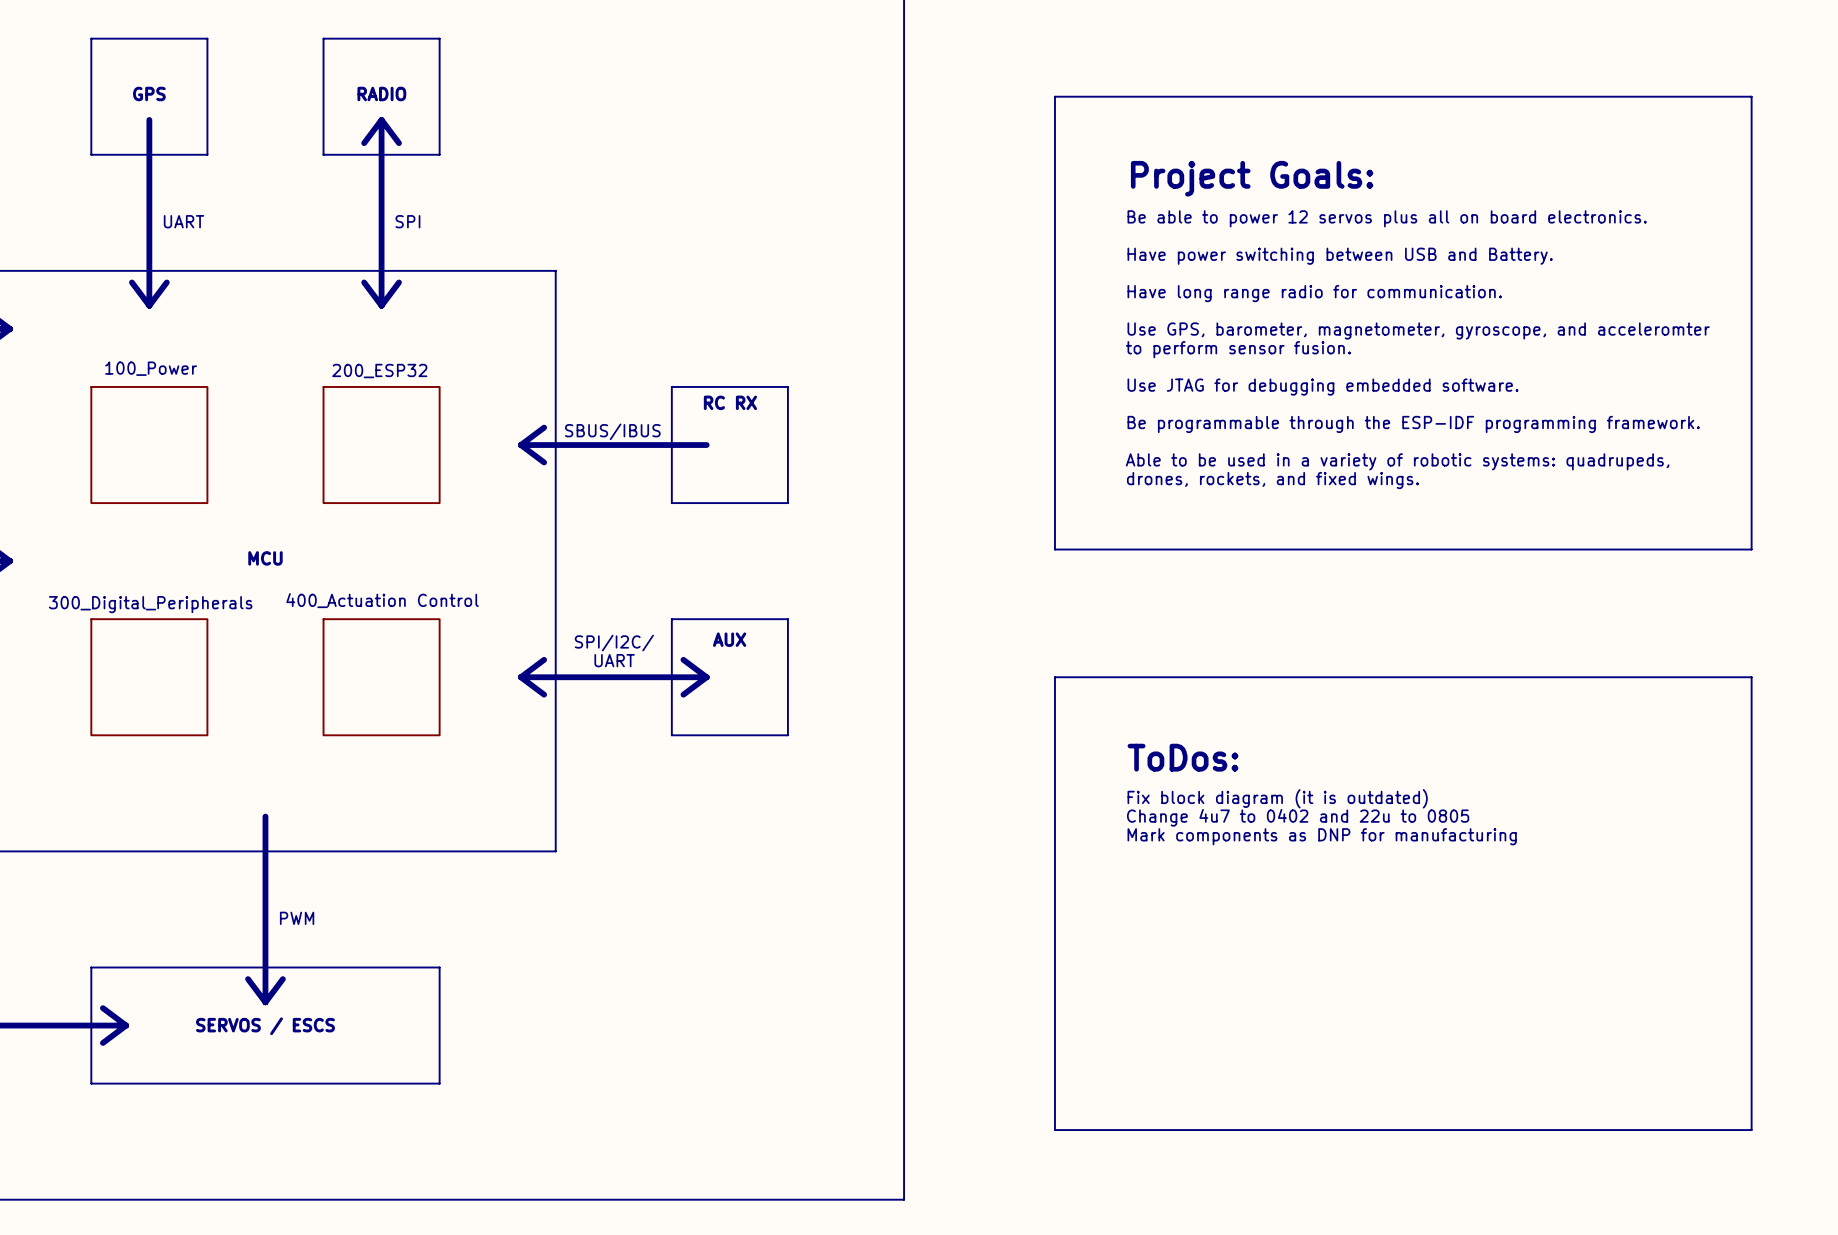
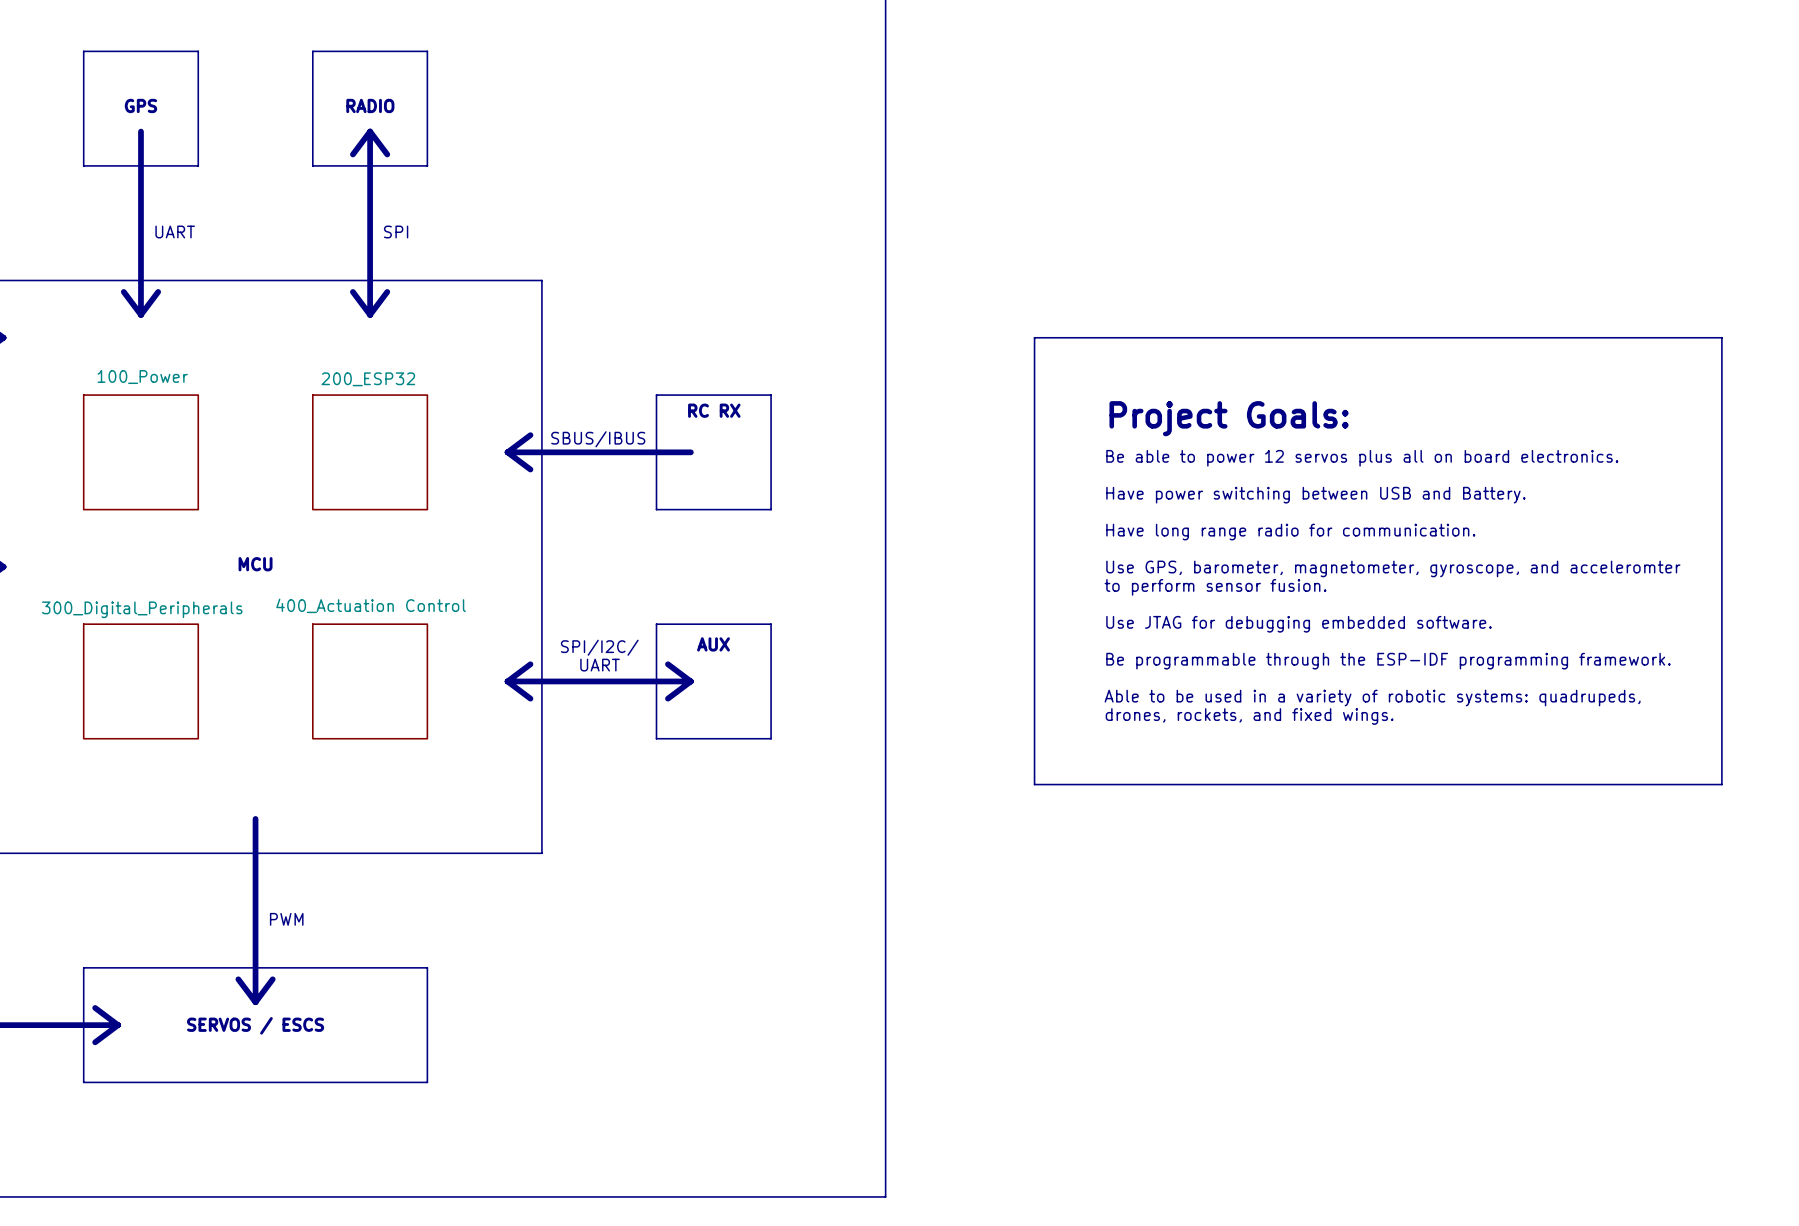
text: Project Goals: (1252, 178) -> none
text: Be able to power 12 servos plus all on board electronics. (1387, 218) -> none
text: Have power switching between USB and Battery. (1340, 256) -> none
text: Have long range radio for communication. (1314, 293) -> none
line: (1054, 328) (1054, 96) (1751, 96) (1751, 328) -> (1034, 337) (1721, 337)
text: Use GPS, barometer, magnetometer, gyroscope, and acceleromter (1418, 330) -> none
text: to perform sensor fusion. (1238, 349) -> none
text: Use JTAG for debugging embedded software. (1322, 387) -> none
text: Be programmable through the ESP-IDF programming framework. (1413, 424) -> Project Goals: (1229, 418)
text: none -> Be able to power 12 servos plus all on board electronics. (1362, 458)
text: Able to be used in a variety of robotic systems: quadrupeds, (1397, 461) -> none
text: drones, rockets, and fixed wings. (1272, 480) -> Have power switching between USB and Battery. (1315, 495)
text: none -> Have long range radio for communication. (1290, 532)
line: (1054, 549) (1751, 549) -> (1034, 555) (1034, 681)
text: none -> Use GPS, barometer, magnetometer, gyroscope, and acceleromter (1393, 568)
text: none -> to perform sensor fusion. (1215, 587)
text: none -> Use JTAG for debugging embedded software. (1298, 624)
text: none -> Be programmable through the ESP-IDF programming framework. (1388, 661)
line: (1054, 677) (1751, 677) -> (1721, 555) (1721, 681)
text: none -> Able to be used in a variety of robotic systems: quadrupeds, (1372, 698)
text: none -> drones, rockets, and fixed wings. (1249, 716)
text: ToDos: (1182, 757) -> none
line: (1054, 781) (1054, 1130) (1751, 1130) (1751, 781) -> (1034, 784) (1721, 784)
text: Fix block diagram (it is outdated) (1277, 798) -> none
text: Change 4u7 to 0402 and 22u to 0805 (1298, 817) -> none
text: Mark components as DNP for manufacturing (1322, 836) -> none

